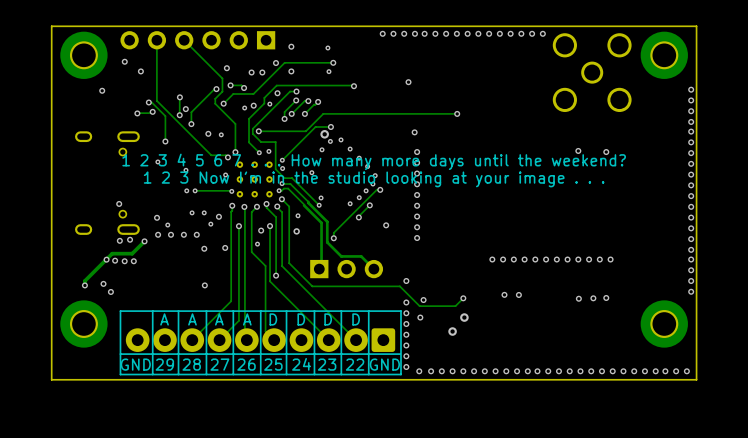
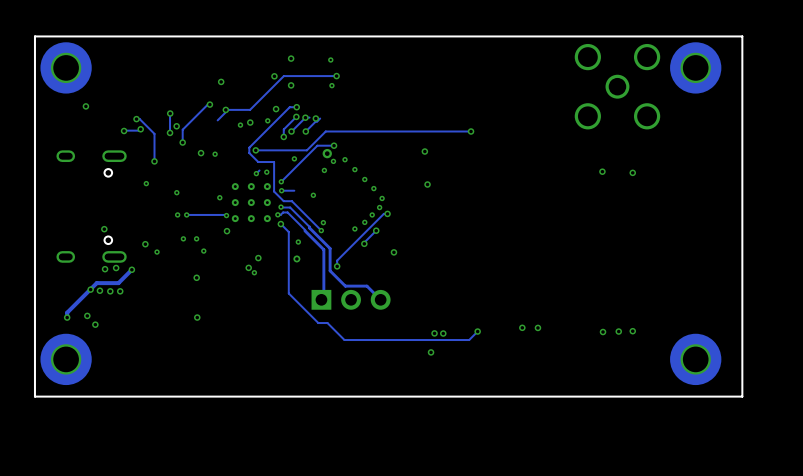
board edge: (696, 26) (696, 379) (51, 379) (51, 26) (55, 26) -> (730, 36) (742, 36) (742, 396) (34, 396) (34, 36)
via: (382, 33) -> none
via: (393, 33) -> none
via: (404, 33) -> none
via: (414, 33) -> none
via: (424, 33) -> none
via: (435, 33) -> none
via: (446, 33) -> none
via: (456, 33) -> none
via: (467, 33) -> none
via: (478, 33) -> none
via: (489, 33) -> none
via: (499, 33) -> none
via: (510, 33) -> none
via: (521, 33) -> none
via: (532, 33) -> none
via: (542, 33) -> none
track: (156, 40) (156, 100) (211, 155) (225, 155) (227, 157) -> none
track: (184, 40) (222, 78) (222, 91) (215, 98) (215, 103) (235, 123) (235, 152) -> none
part: (197, 40) -> none
via: (124, 61) -> none
via: (140, 71) -> none
via: (251, 72) -> none
via: (262, 72) -> none
via: (408, 82) -> none
track: (230, 85) (241, 85) (244, 88) -> none
via: (230, 85) -> none
track: (353, 86) (276, 85) (264, 97) (264, 103) (249, 118) (249, 142) (259, 152) -> (259, 170) (256, 173)
via: (353, 86) -> none
via: (244, 88) -> none
via: (691, 89) -> none
via: none -> (225, 109)
via: (691, 100) -> none
via: none -> (305, 117)
via: (308, 101) -> none
via: none -> (315, 118)
via: (318, 101) -> none
via: (223, 103) -> none
via: (691, 111) -> none
via: (691, 121) -> none
via: (691, 131) -> none
via: none -> (294, 158)
via: (691, 142) -> none
via: (235, 152) -> none
via: (417, 152) -> none
via: (691, 153) -> none
via: (227, 157) -> none
text: 1 2 3 4 5 6 7 . . . How many more days until the weekend? (374, 161) -> none
via: (691, 163) -> none
track: none -> (294, 190) (281, 190)
via: (417, 173) -> none
via: (691, 174) -> none
text: 1 2 3 Now I'm in the studio looking at your image . . . (374, 179) -> none
via: (417, 184) -> none
via: (691, 185) -> none
via: (417, 195) -> none
via: (691, 196) -> none
track: (266, 203) (266, 207) (276, 217) (276, 275) -> none
via: (266, 203) -> none
track: (232, 205) (231, 301) (192, 340) -> none
via: (417, 205) -> none
track: (244, 206) (244, 338) (246, 340) -> none
via: (244, 206) -> none
track: (256, 206) (251, 212) (251, 252) (265, 265) (265, 331) (274, 340) -> none
via: (256, 206) -> none
track: (277, 206) (282, 212) (282, 266) (356, 340) -> none
via: (277, 206) -> none
via: (691, 206) -> none
via: (218, 216) -> none
via: (417, 216) -> none
via: (691, 217) -> none
track: (238, 226) (238, 320) (219, 340) -> none
via: (238, 226) -> none
track: (270, 226) (270, 281) (328, 340) -> none
via: (270, 226) -> none
via: (417, 227) -> none
via: (691, 228) -> none
via: (158, 234) -> none
via: (170, 234) -> none
via: (183, 234) -> none
via: (196, 234) -> none
via: (417, 238) -> none
via: none -> (248, 267)
via: (691, 239) -> none
via: (225, 247) -> none
via: (691, 249) -> none
via: (492, 259) -> none
via: (503, 259) -> none
via: (513, 259) -> none
via: (524, 259) -> none
via: (535, 259) -> none
via: (546, 259) -> none
via: (556, 259) -> none
via: (567, 259) -> none
via: (578, 259) -> none
via: (589, 259) -> none
via: (599, 259) -> none
via: (610, 259) -> none
via: (691, 259) -> none
via: (691, 270) -> none
via: (276, 275) -> none
via: (406, 281) -> none
via: (691, 281) -> none
track: (312, 286) (399, 286) (419, 306) -> (313, 318) (318, 323) (327, 323) (344, 340) (430, 340)
via: (691, 291) -> none
via: none -> (443, 333)
via: (406, 302) -> none
line: (152, 311) (152, 374) -> none
line: (178, 311) (178, 374) -> none
line: (206, 311) (206, 374) -> none
line: (233, 311) (233, 374) -> none
line: (260, 311) (260, 374) -> none
line: (286, 311) (286, 374) -> none
line: (314, 311) (314, 374) -> none
line: (341, 311) (341, 374) -> none
line: (368, 311) (368, 374) -> none
line: (400, 311) (120, 311) (120, 374) (400, 374) (400, 311) -> none
via: (406, 313) -> none
via: (464, 317) -> none
text: A (164, 319) -> none
text: A (192, 319) -> none
text: A (219, 319) -> none
text: A (247, 319) -> none
text: D (273, 319) -> none
text: D (301, 319) -> none
text: D (328, 319) -> none
text: D (356, 319) -> none
via: (406, 324) -> none
via: (452, 331) -> none
via: (406, 334) -> none
part: (260, 340) -> none
via: (406, 345) -> none
line: (399, 354) (120, 354) -> none
via: (406, 356) -> none
text: GND (135, 364) -> none
text: 29 (164, 364) -> none
text: 28 (191, 364) -> none
text: 27 (219, 364) -> none
text: 26 (246, 364) -> none
text: 25 (273, 364) -> none
text: 24 (301, 364) -> none
text: 23 (327, 364) -> none
text: 22 (355, 364) -> none
text: GND (384, 364) -> none
via: (406, 366) -> none
via: (419, 371) -> none
via: (431, 371) -> none
via: (441, 371) -> none
via: (452, 371) -> none
via: (463, 371) -> none
via: (474, 371) -> none
via: (484, 371) -> none
via: (495, 371) -> none
via: (506, 371) -> none
via: (517, 371) -> none
via: (527, 371) -> none
via: (537, 371) -> none
via: (548, 371) -> none
via: (558, 371) -> none
via: (569, 371) -> none
via: (580, 371) -> none
via: (591, 371) -> none
via: (601, 371) -> none
via: (612, 371) -> none
via: (623, 371) -> none
via: (634, 371) -> none
via: (644, 371) -> none
via: (655, 371) -> none
via: (665, 371) -> none
via: (676, 371) -> none
via: (686, 371) -> none

